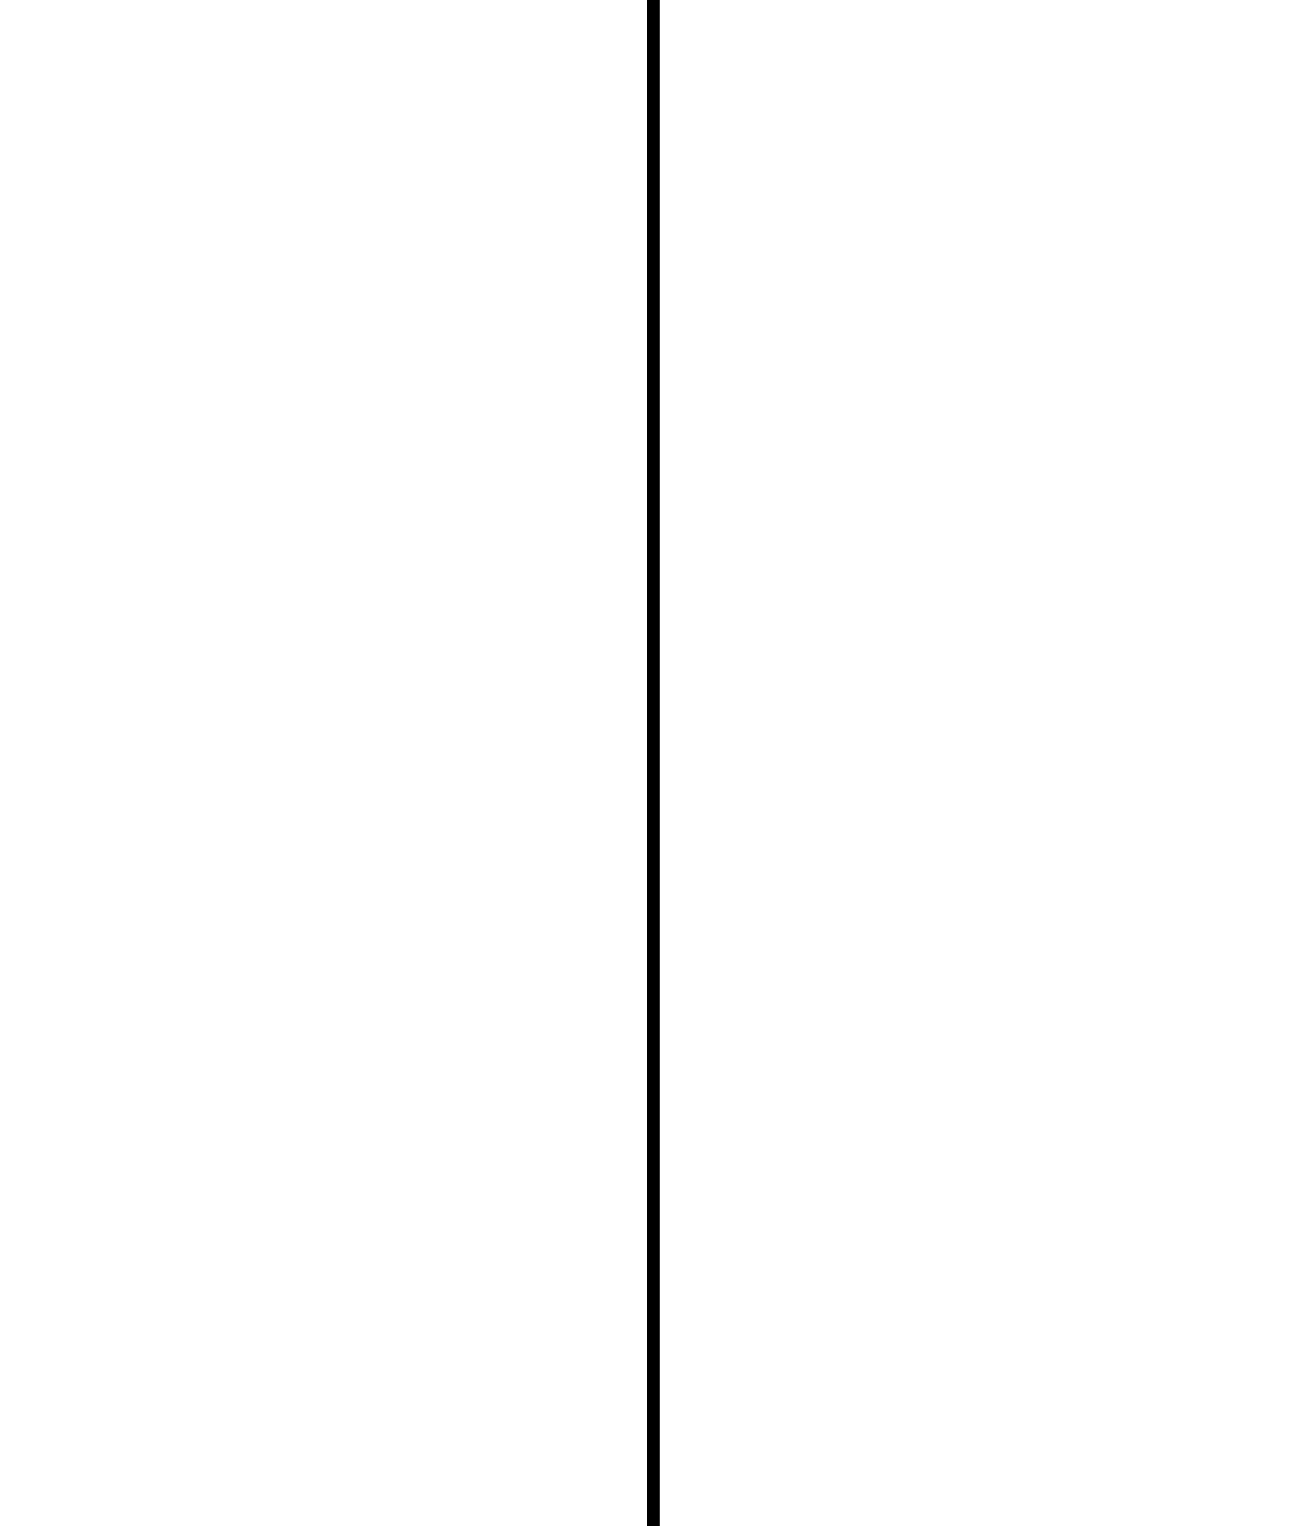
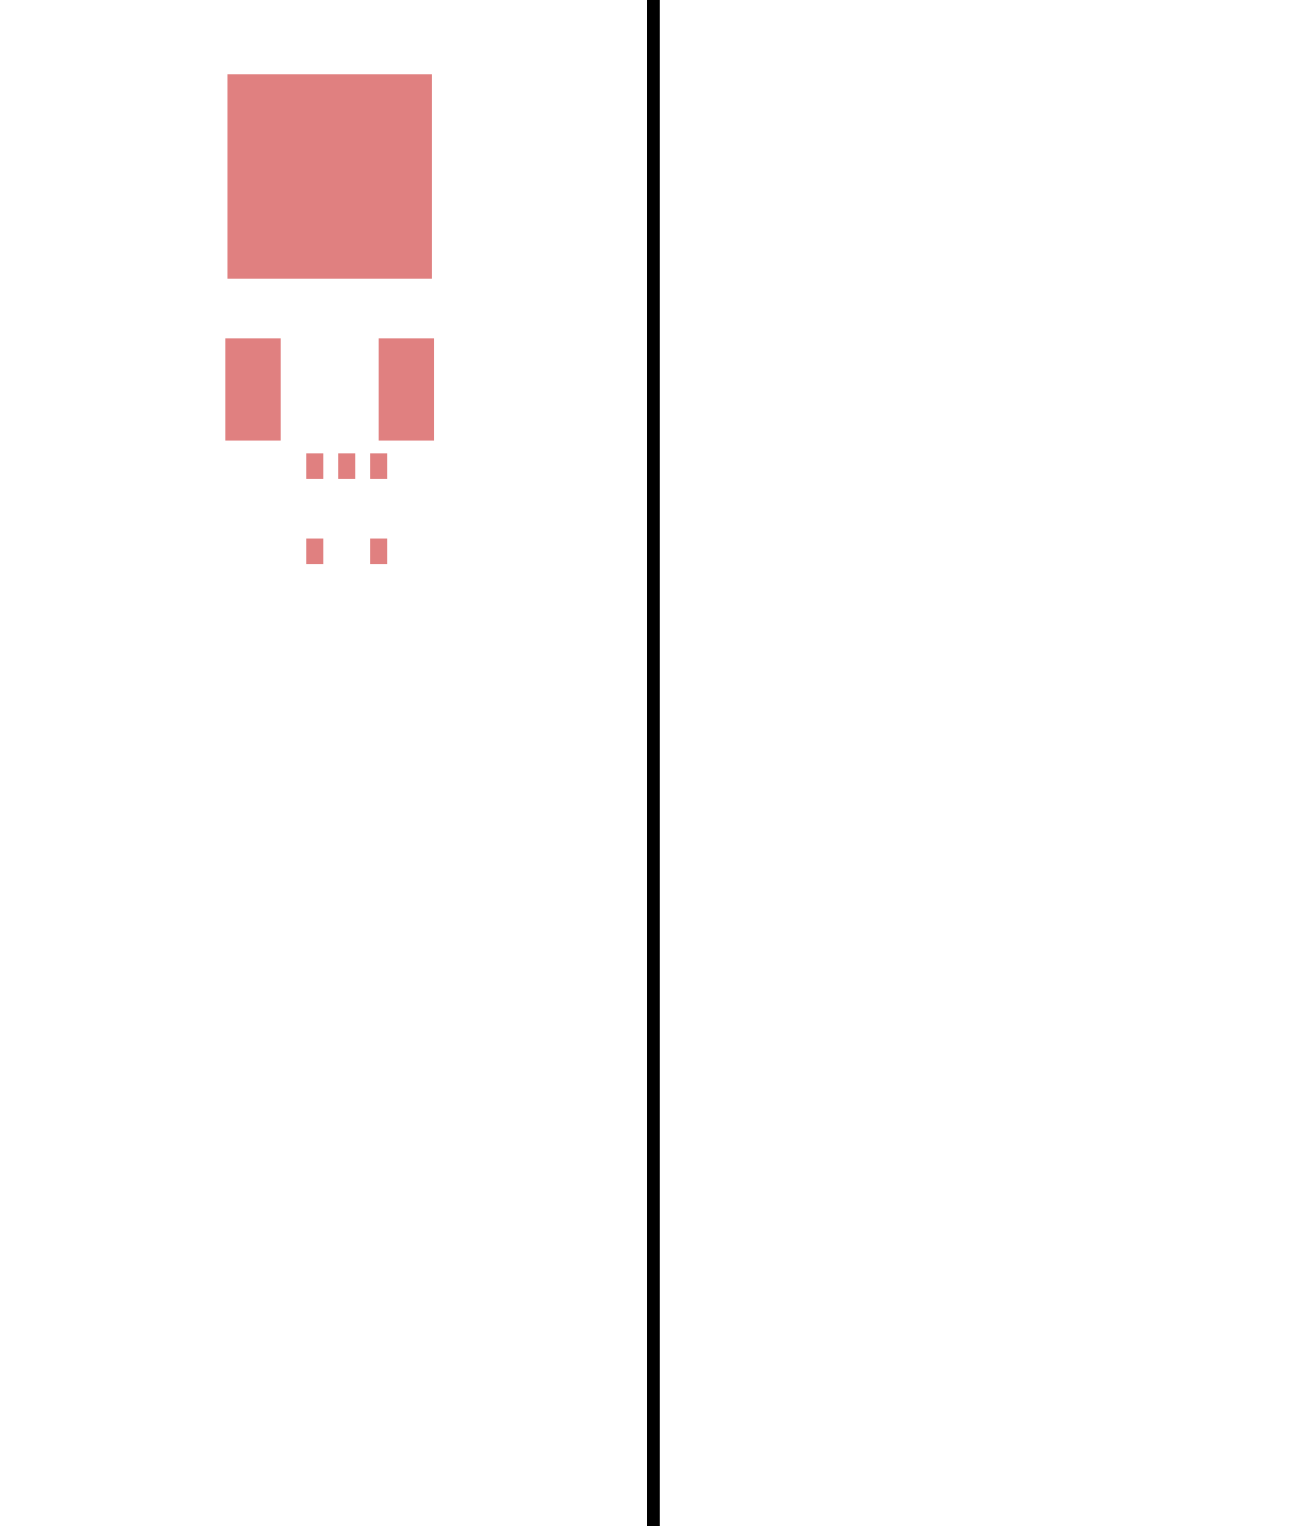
part: none -> (329, 257)
part: none -> (346, 508)

